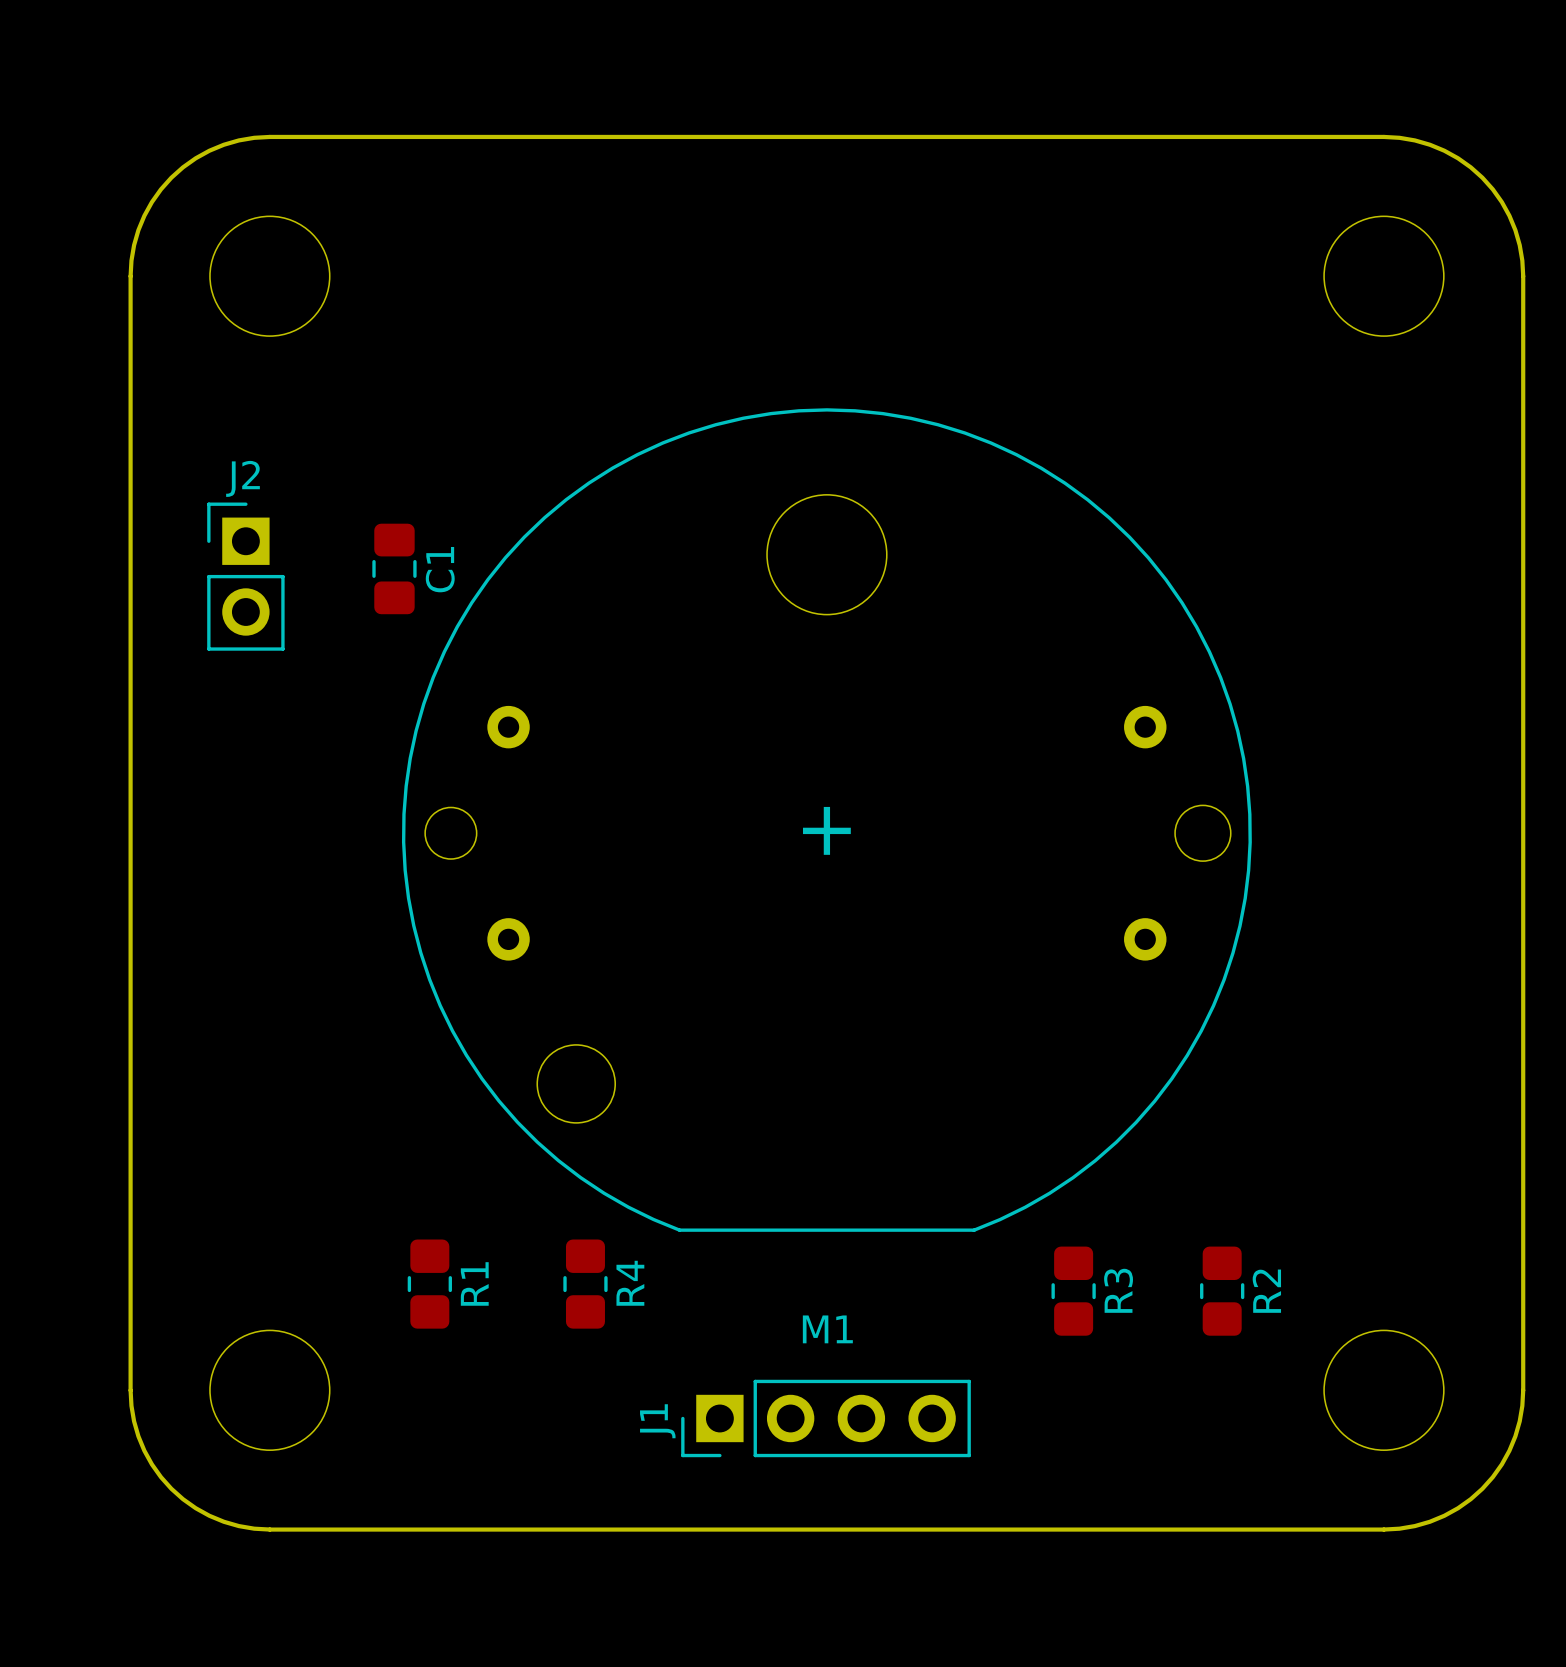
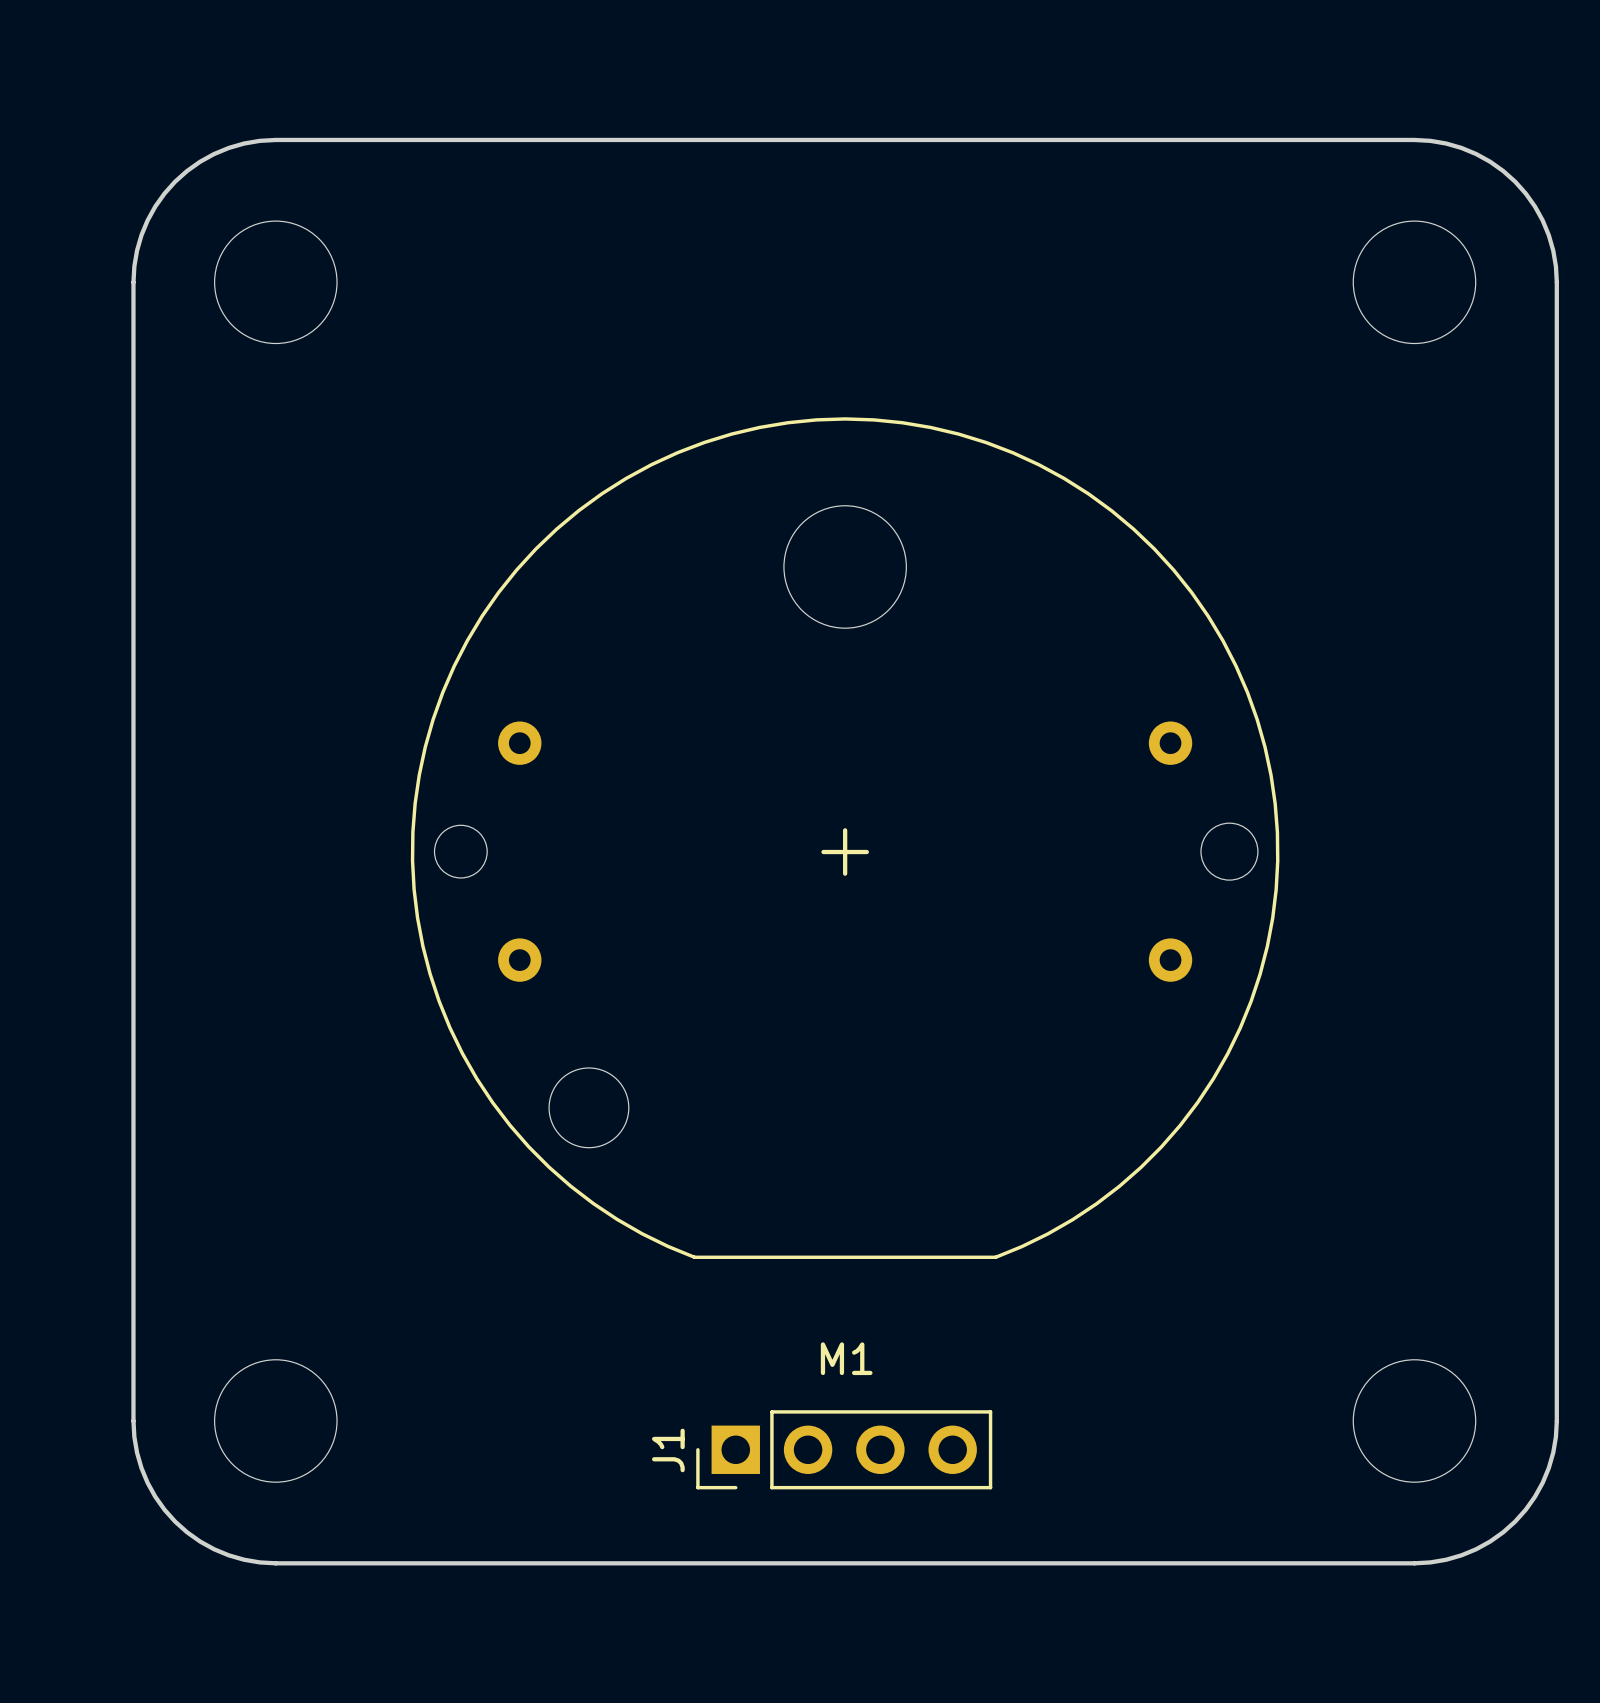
C1: (394, 568) -> none
J2: (245, 576) -> none
R1: (429, 1284) -> none
R4: (585, 1284) -> none
R3: (1073, 1291) -> none
R2: (1222, 1291) -> none

